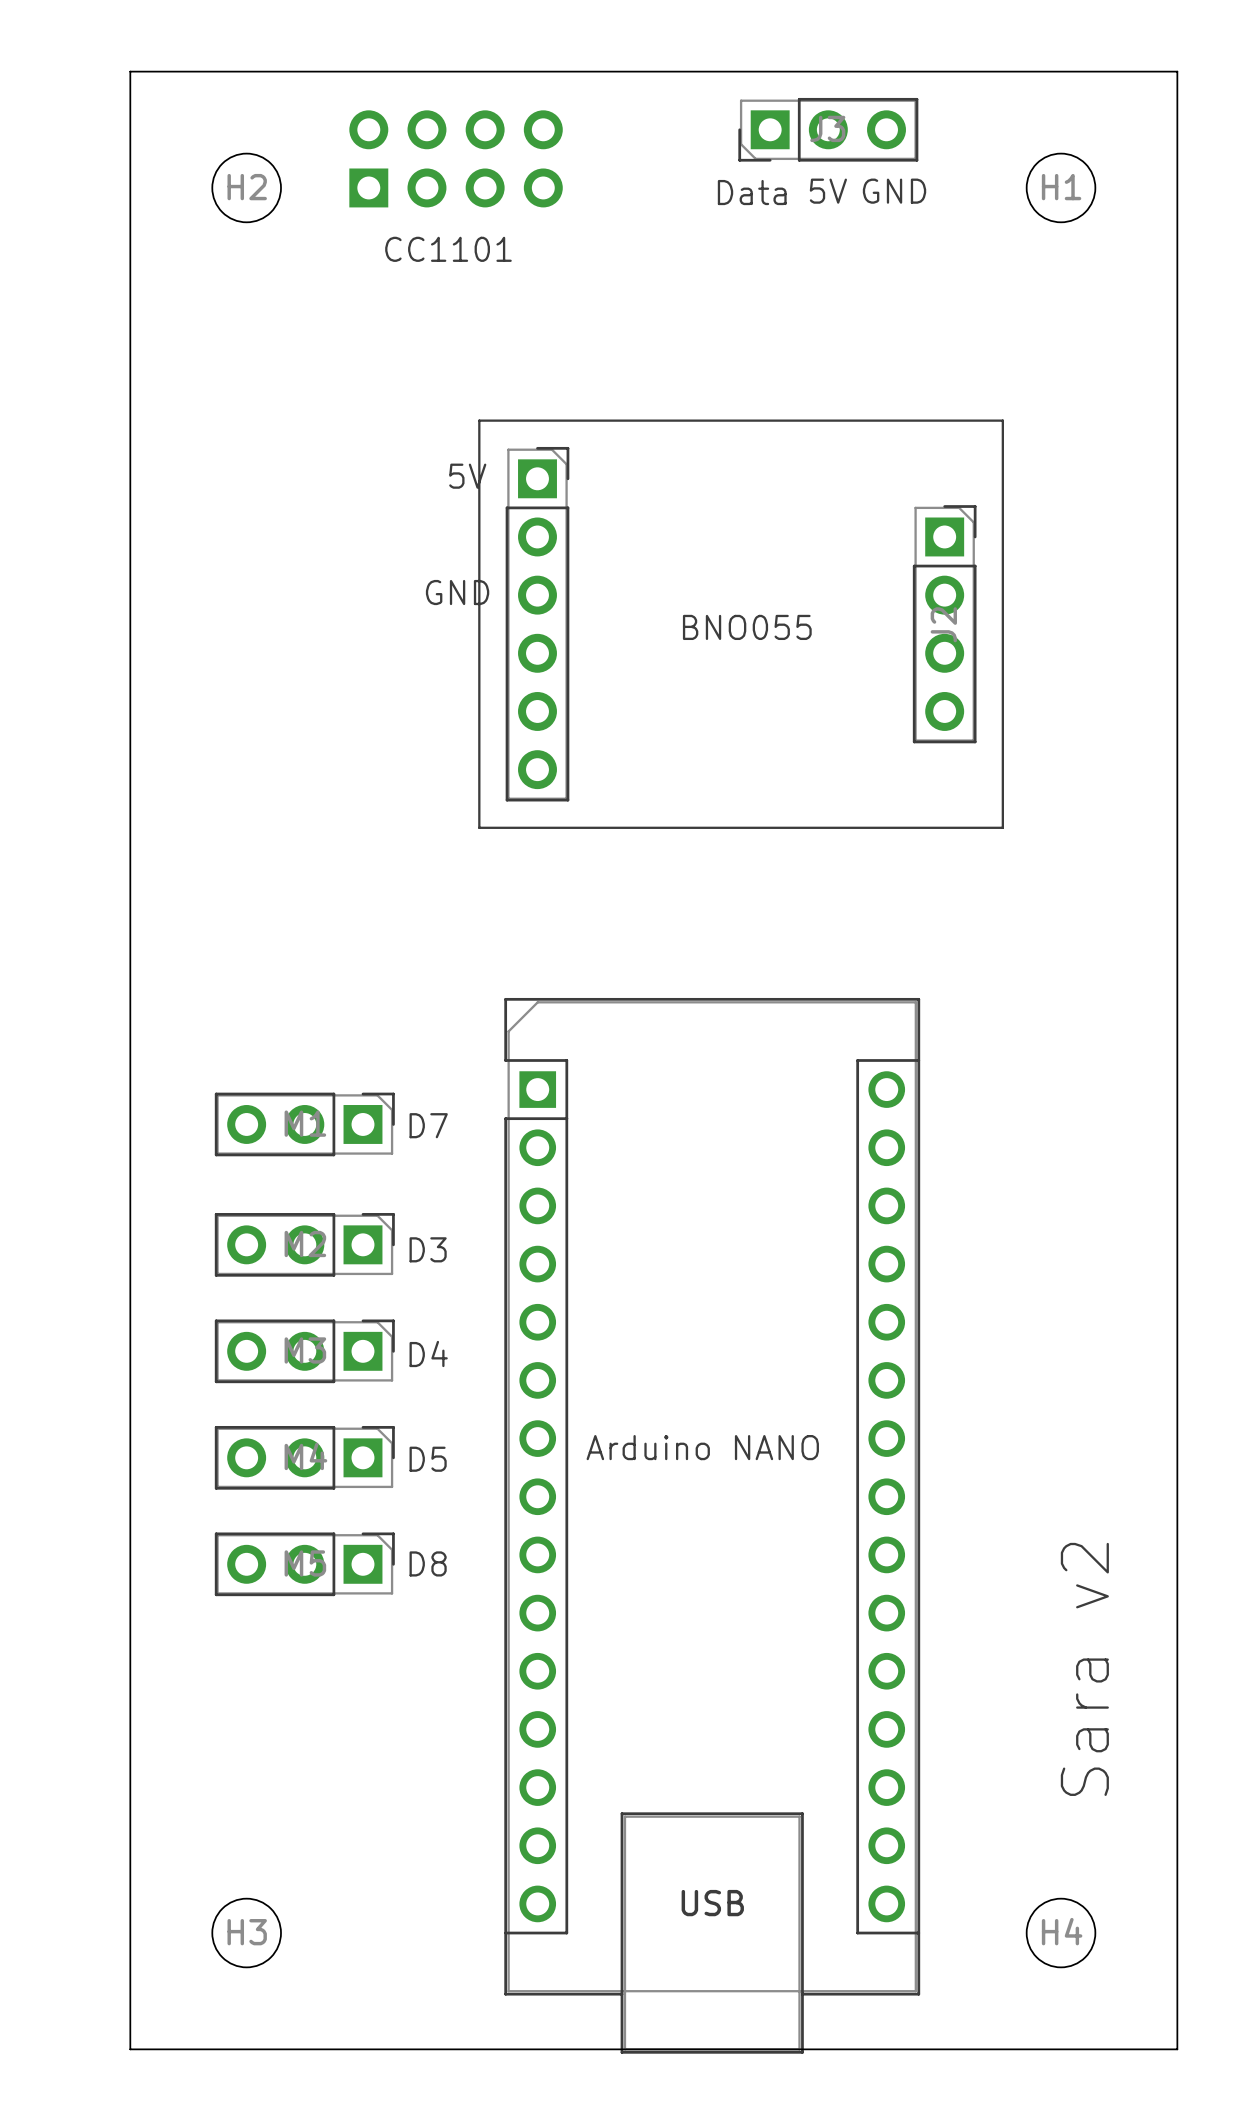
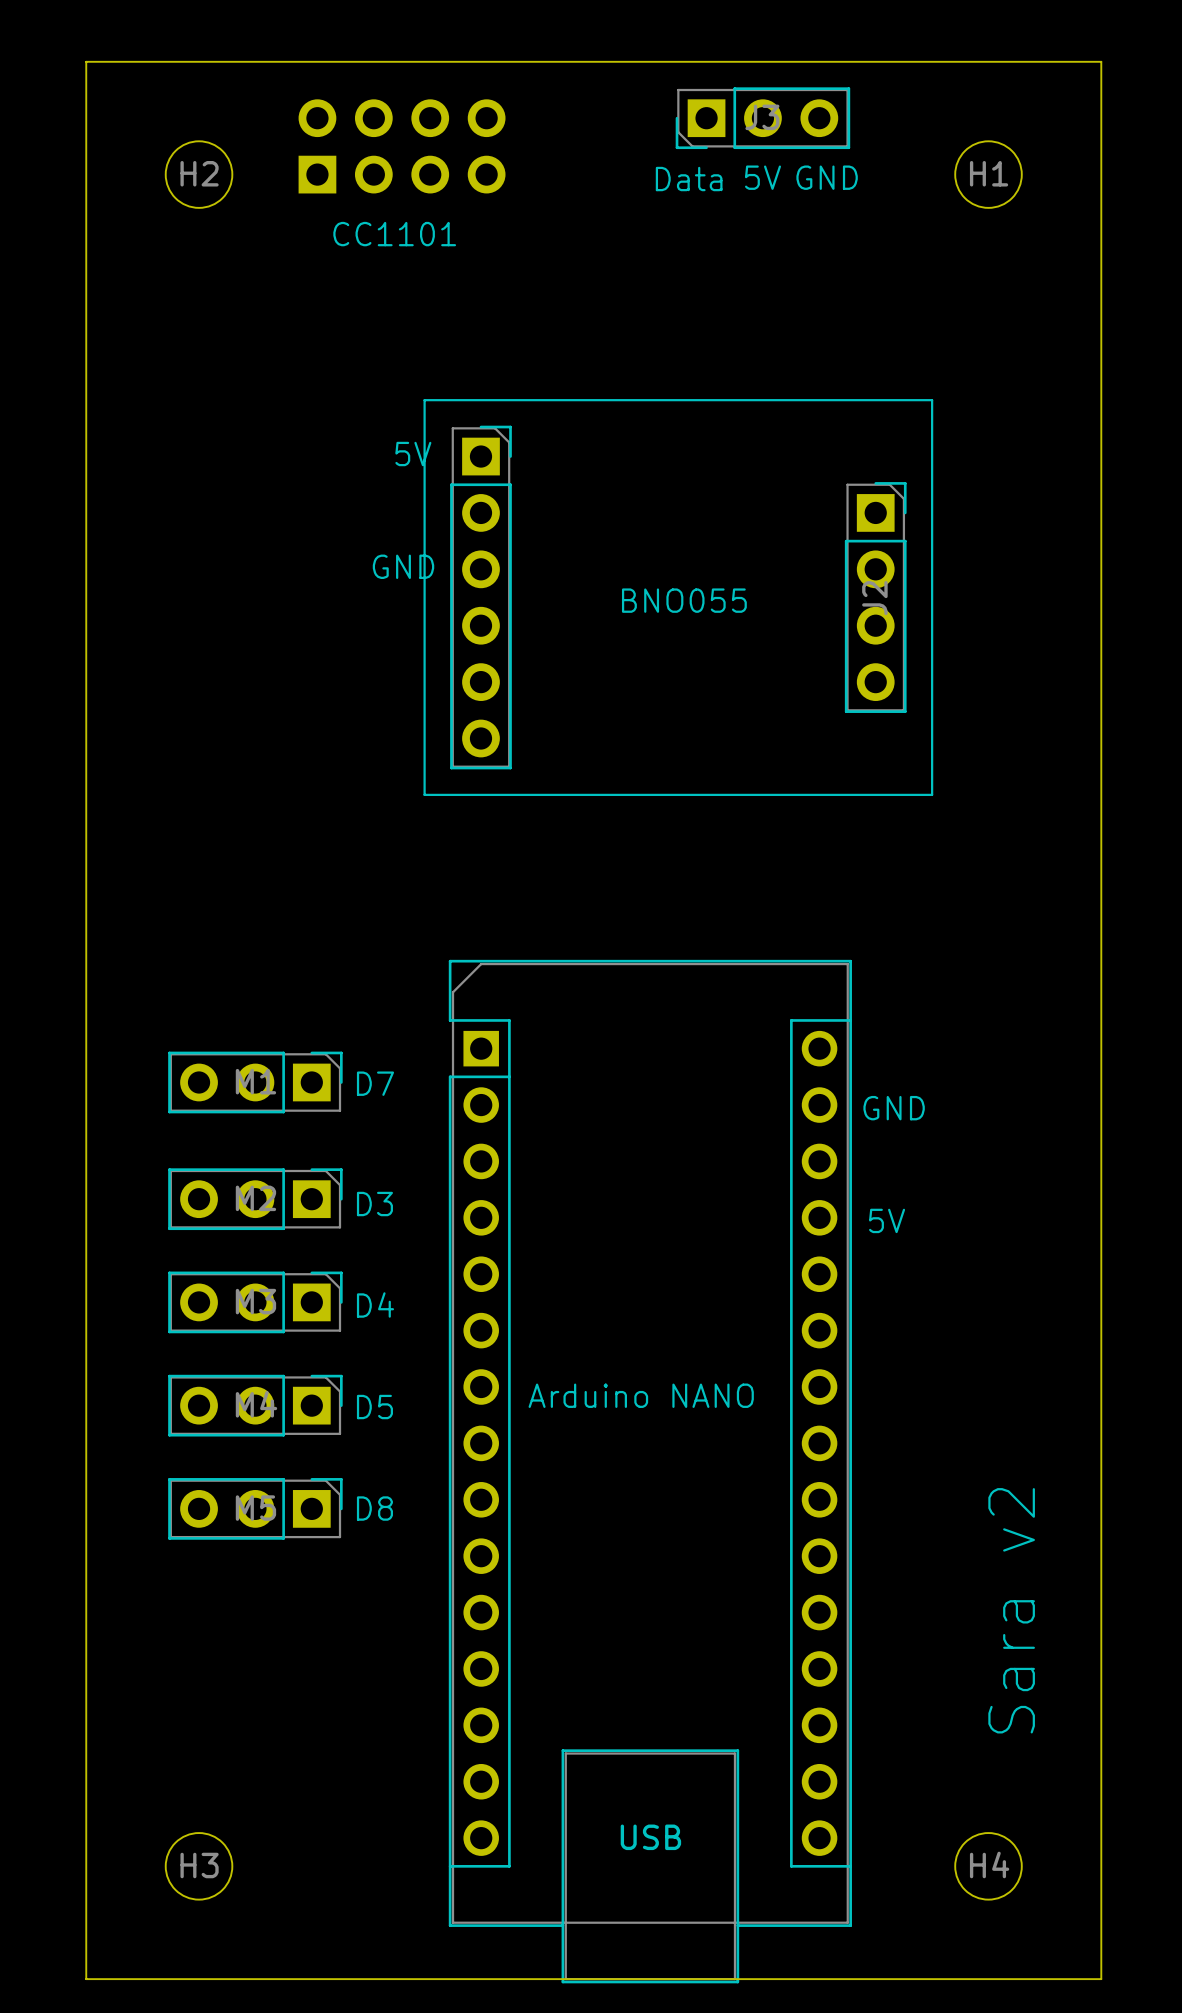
text: none -> GND (894, 1108)
text: none -> 5V (887, 1220)

